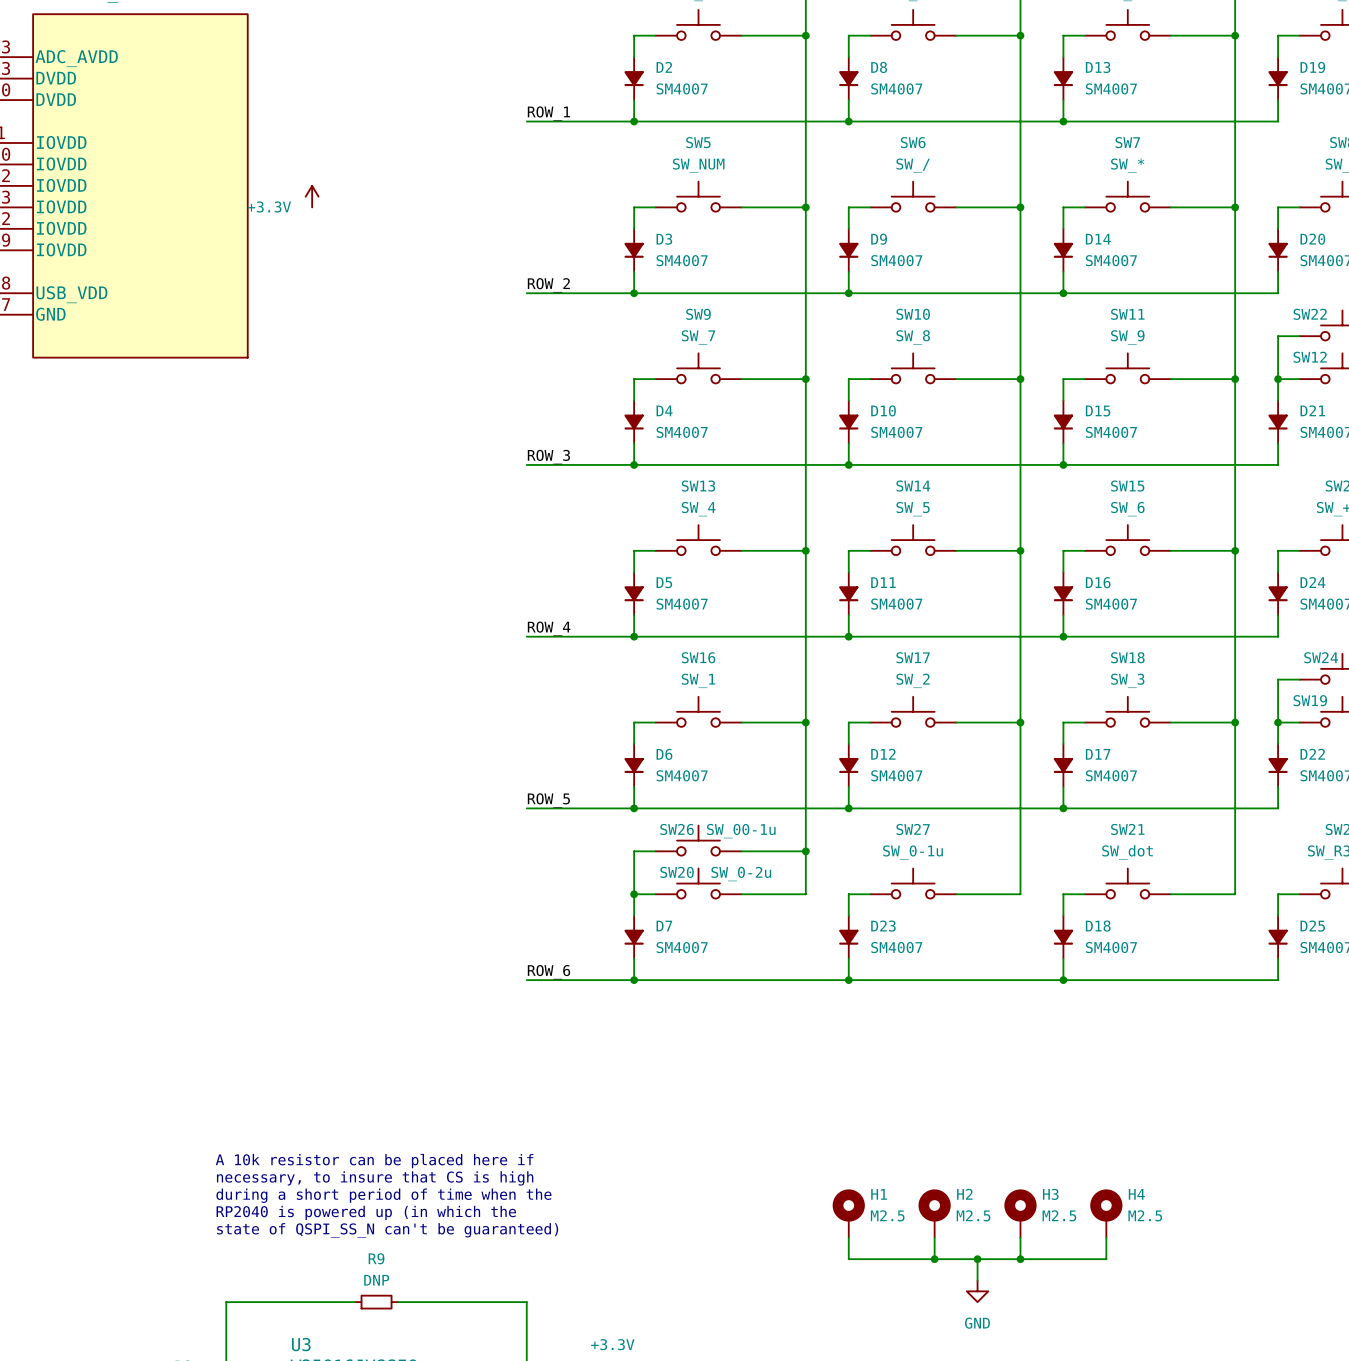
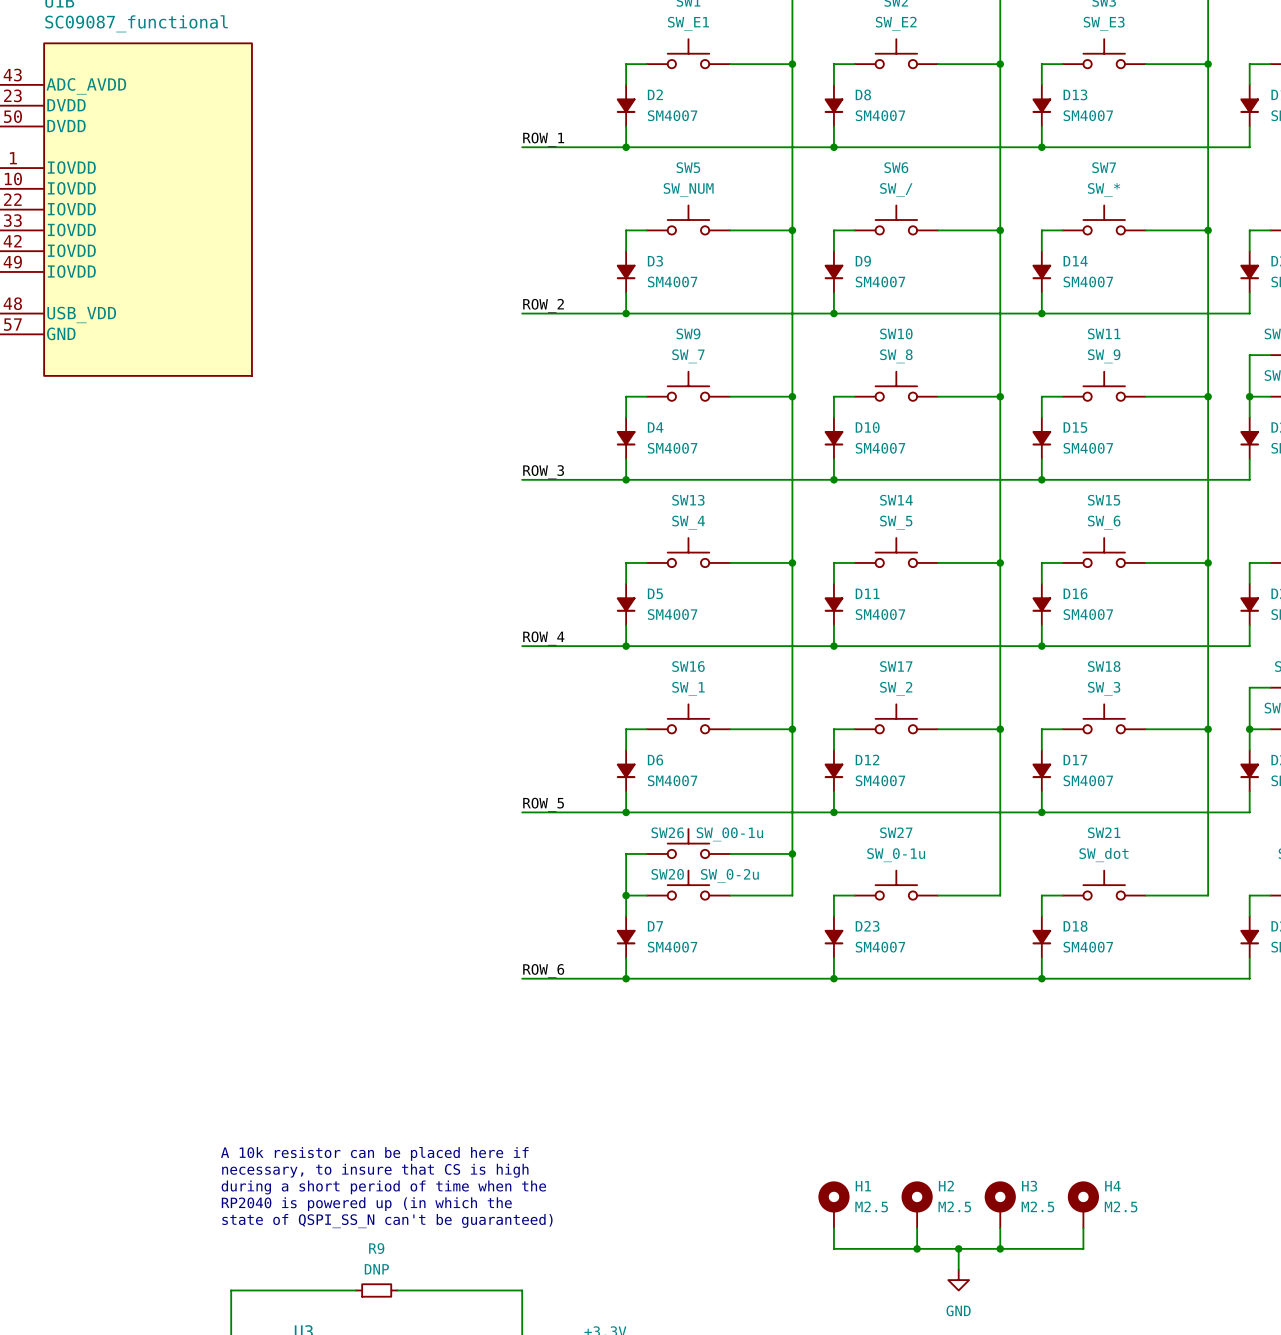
power symbol: +3.3V (312, 196) -> none

